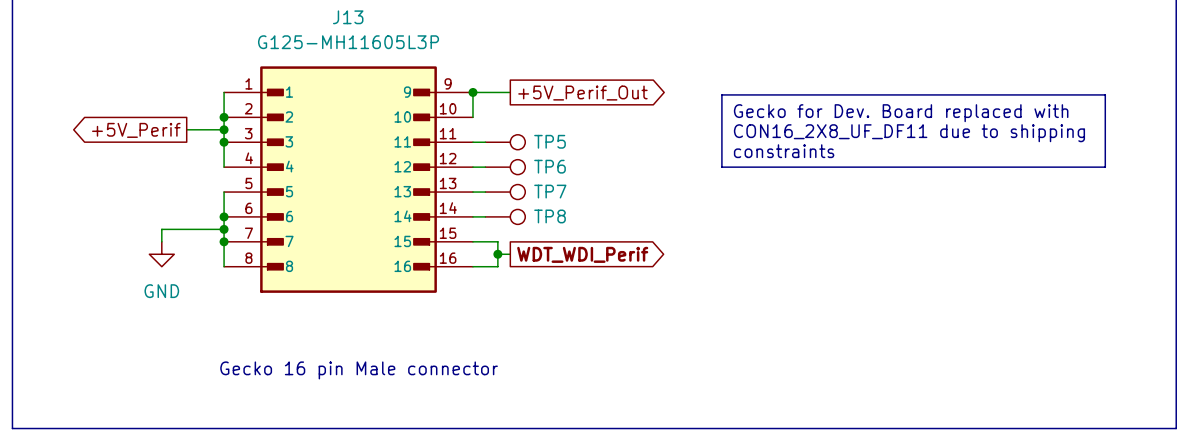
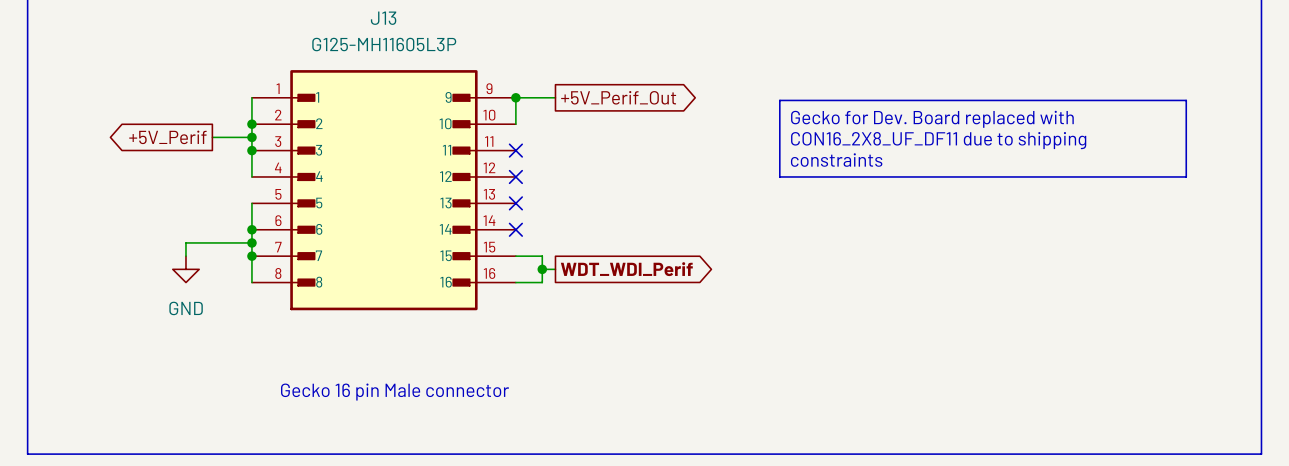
wire: (472, 142) (485, 142) -> none
no-connect mark: none -> (515, 150)
TP5: (505, 142) -> none
wire: (472, 167) (485, 167) -> none
no-connect mark: none -> (515, 176)
TP6: (505, 167) -> none
wire: (472, 192) (485, 192) -> none
no-connect mark: none -> (515, 203)
TP7: (505, 192) -> none
wire: (472, 216) (485, 216) -> none
no-connect mark: none -> (515, 229)
TP8: (505, 216) -> none

